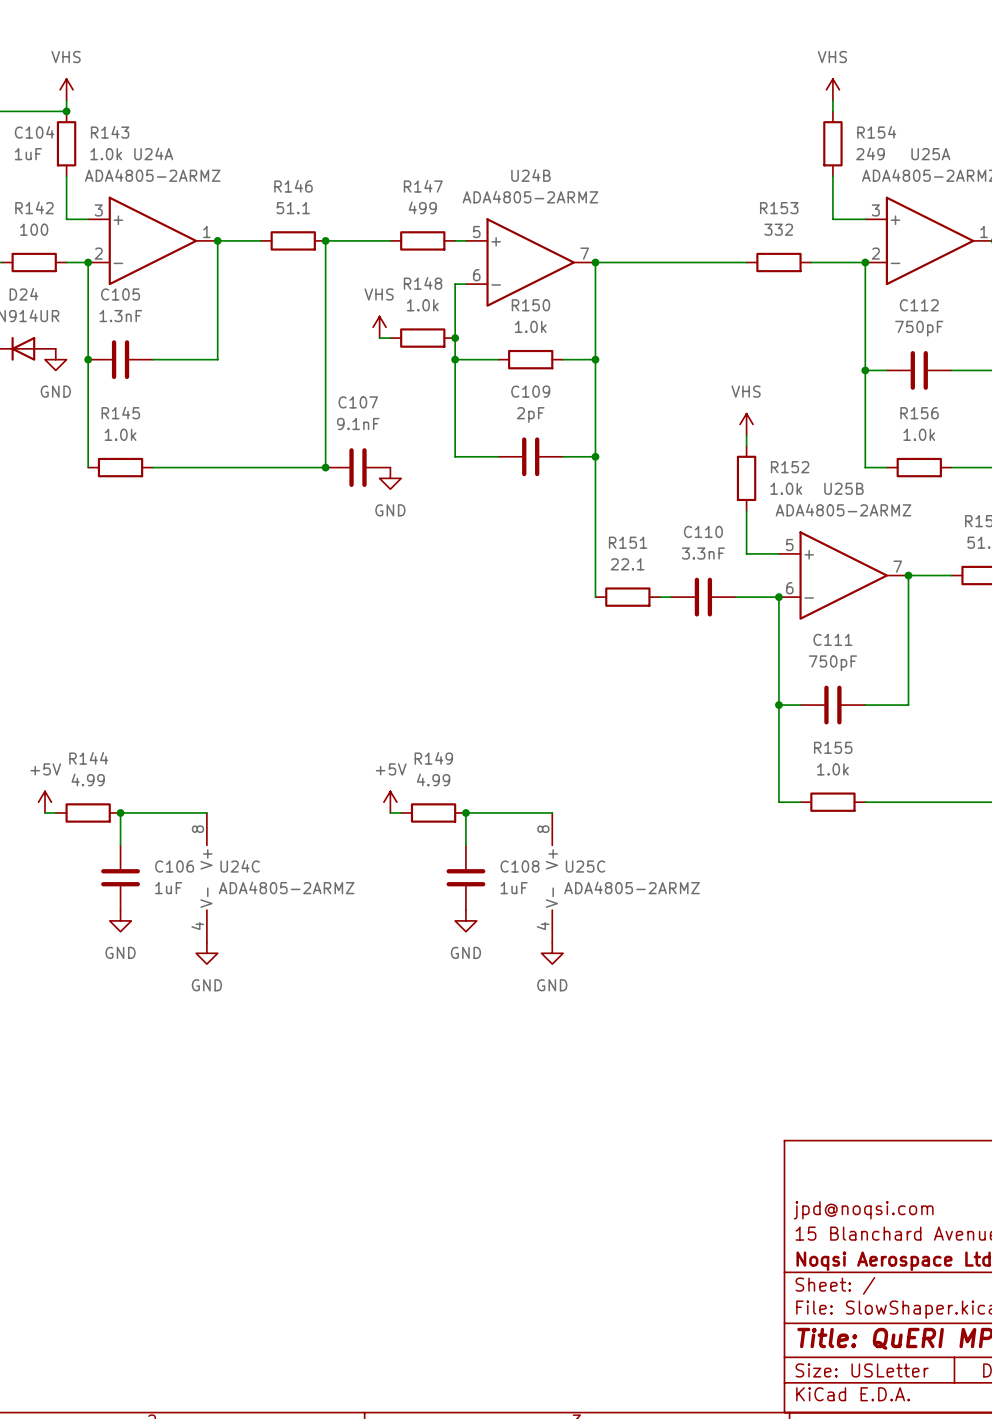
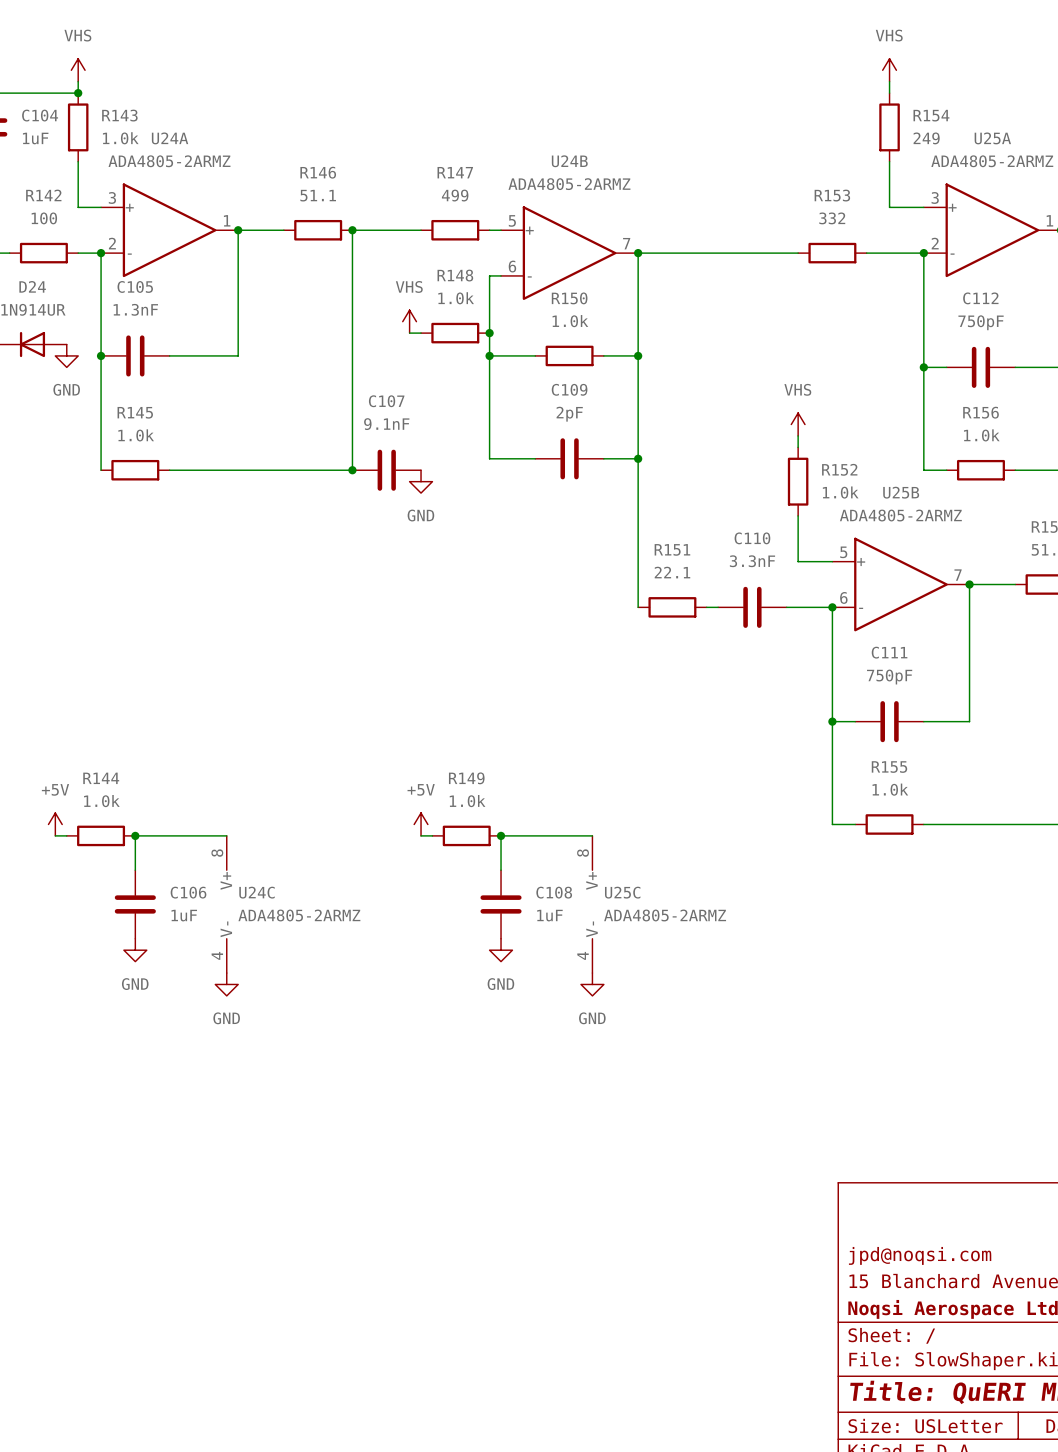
R144 value: 4.99 (88, 779) -> 1.0k (101, 801)
R149 value: 4.99 (433, 779) -> 1.0k (467, 801)

